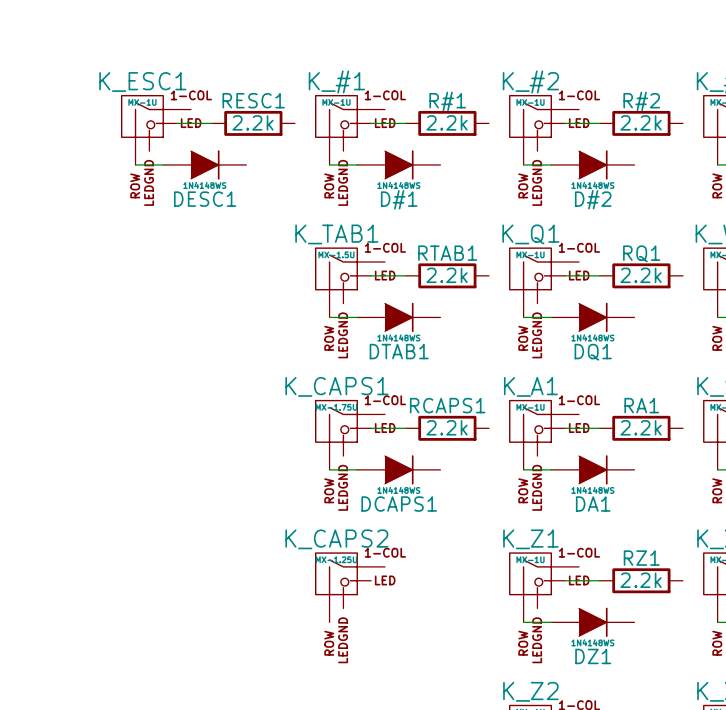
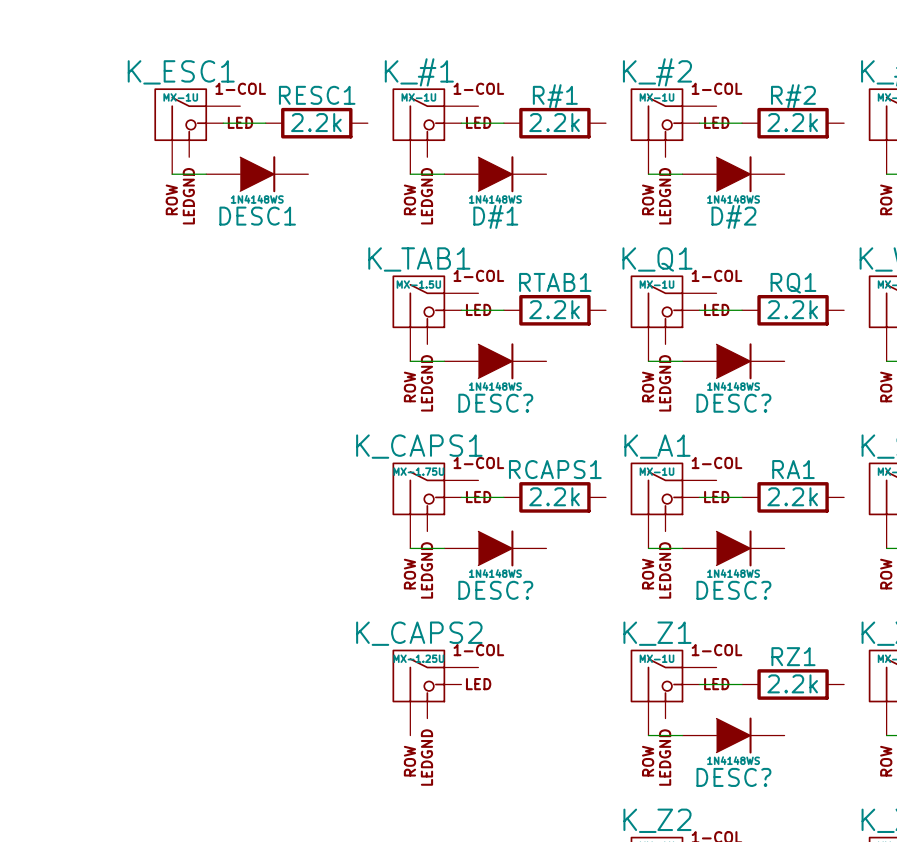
DTAB1 name: DTAB1 (399, 351) -> DESC? (495, 403)
DQ1 name: DQ1 (593, 352) -> DESC? (733, 403)
DCAPS1 name: DCAPS1 (399, 504) -> DESC? (495, 590)
DA1 name: DA1 (593, 504) -> DESC? (733, 590)
DZ1 name: DZ1 (593, 656) -> DESC? (733, 777)

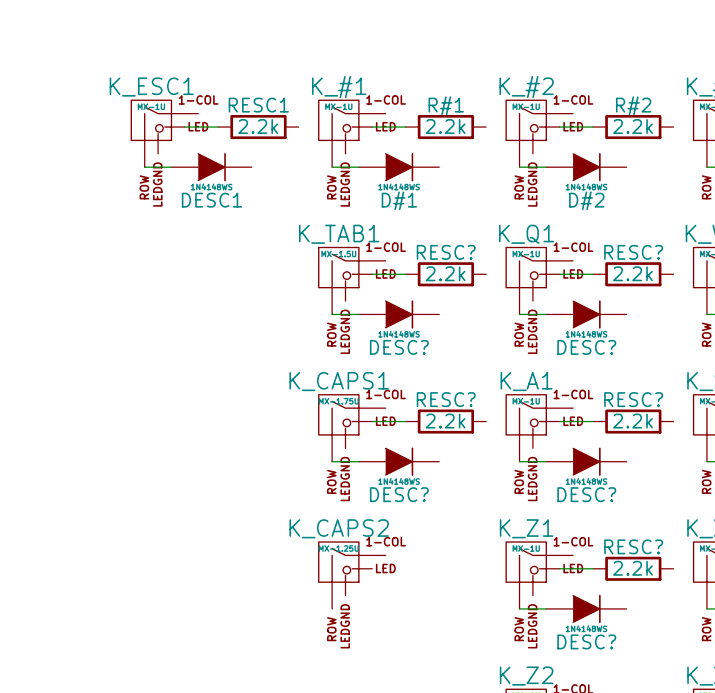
RTAB1 name: RTAB1 (555, 282) -> RESC? (446, 252)
RQ1 name: RQ1 (793, 283) -> RESC? (633, 252)
RCAPS1 name: RCAPS1 (555, 469) -> RESC? (446, 399)
RA1 name: RA1 (793, 469) -> RESC? (633, 399)
RZ1 name: RZ1 (793, 656) -> RESC? (633, 546)

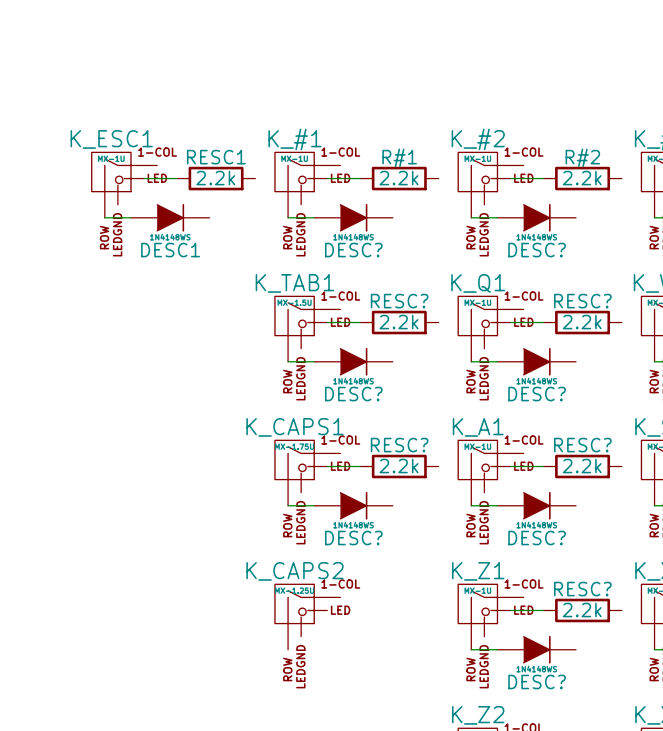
D#1 name: D#1 (399, 200) -> DESC? (353, 250)
D#2 name: D#2 (586, 200) -> DESC? (537, 250)

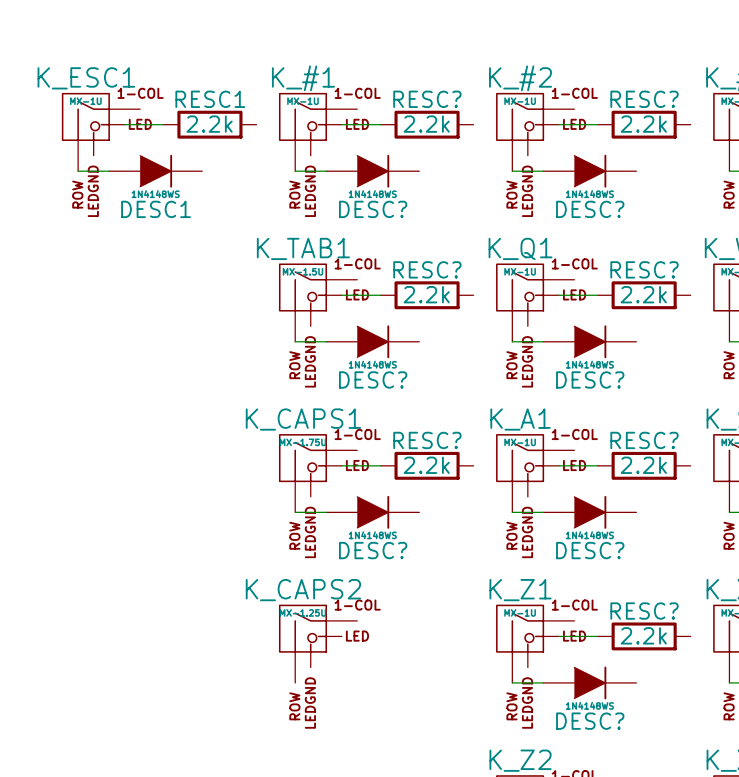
R#1 name: R#1 (399, 157) -> RESC? (427, 99)
R#2 name: R#2 (582, 157) -> RESC? (644, 99)

